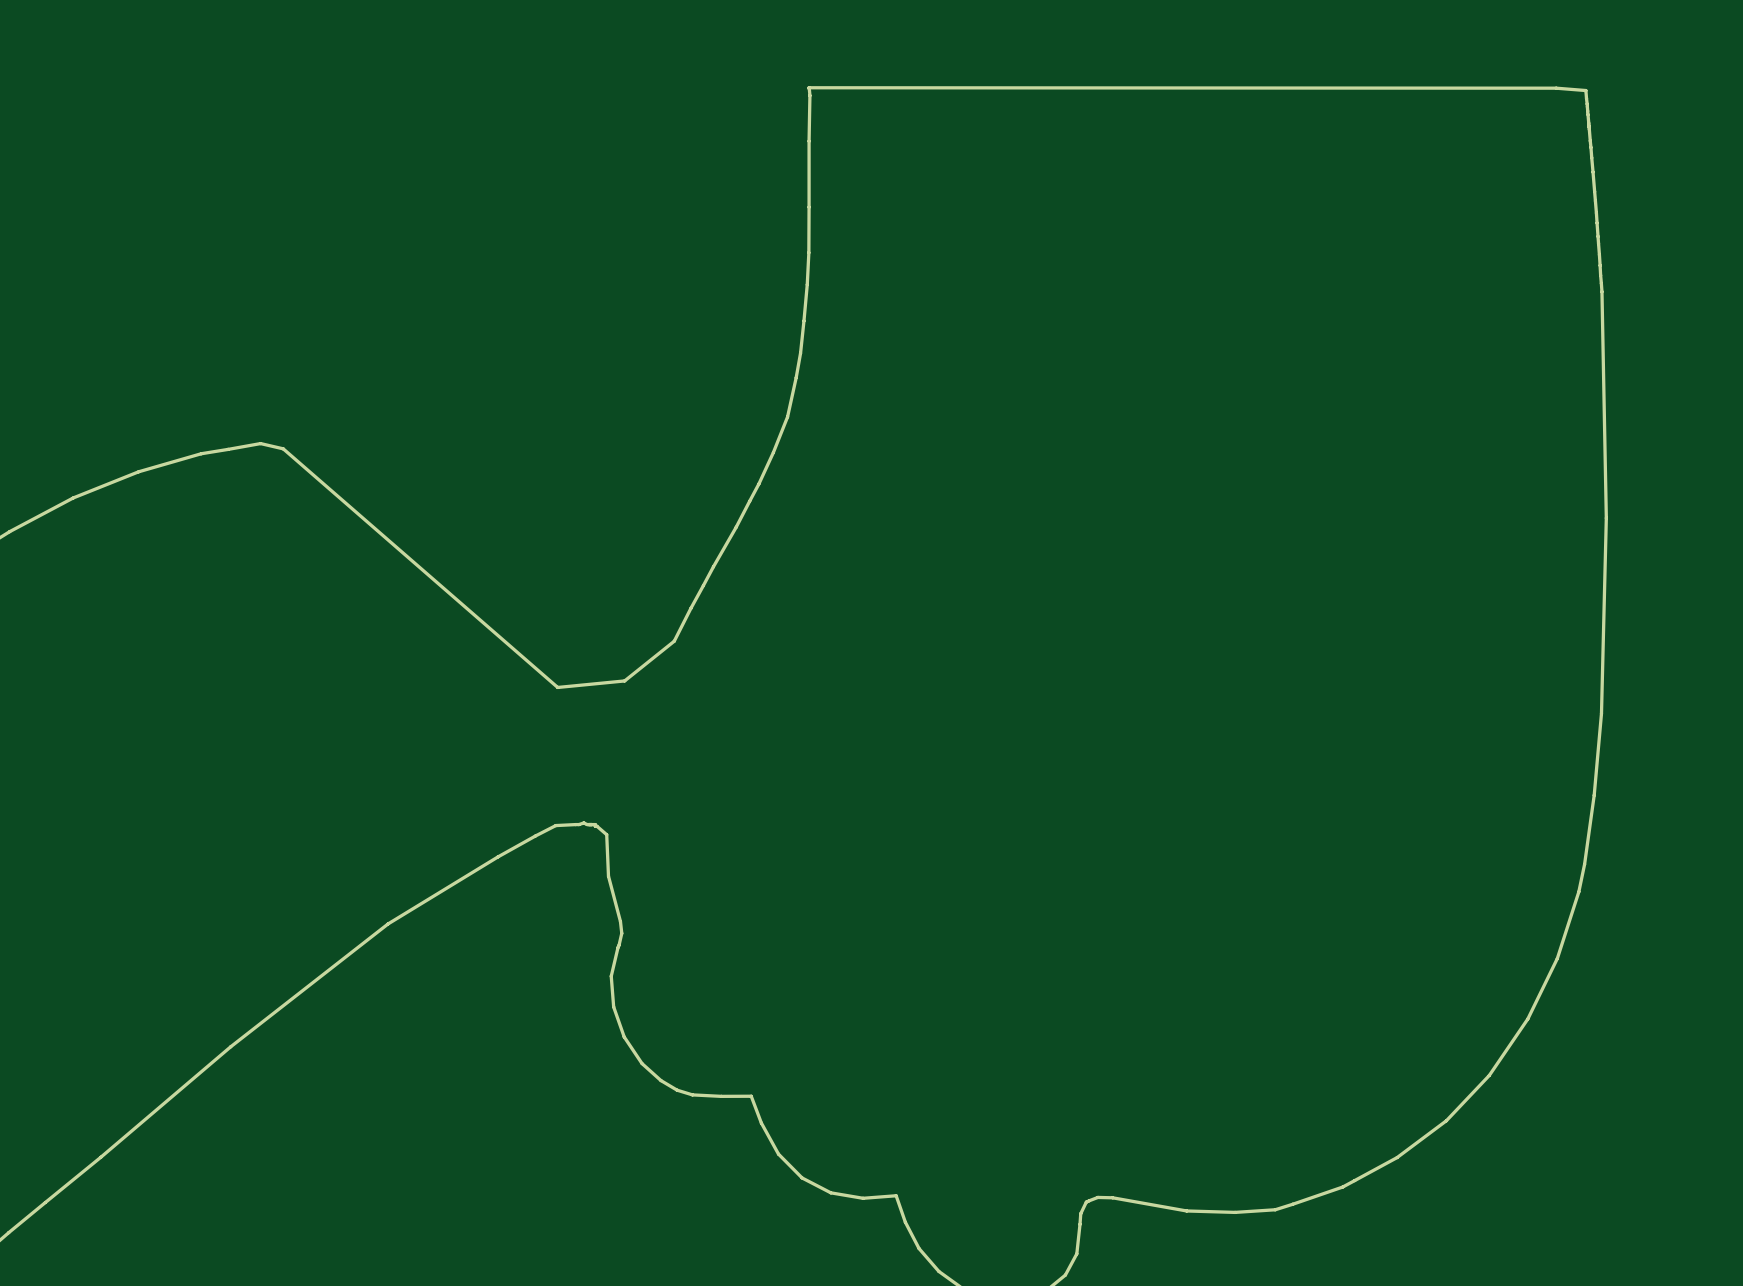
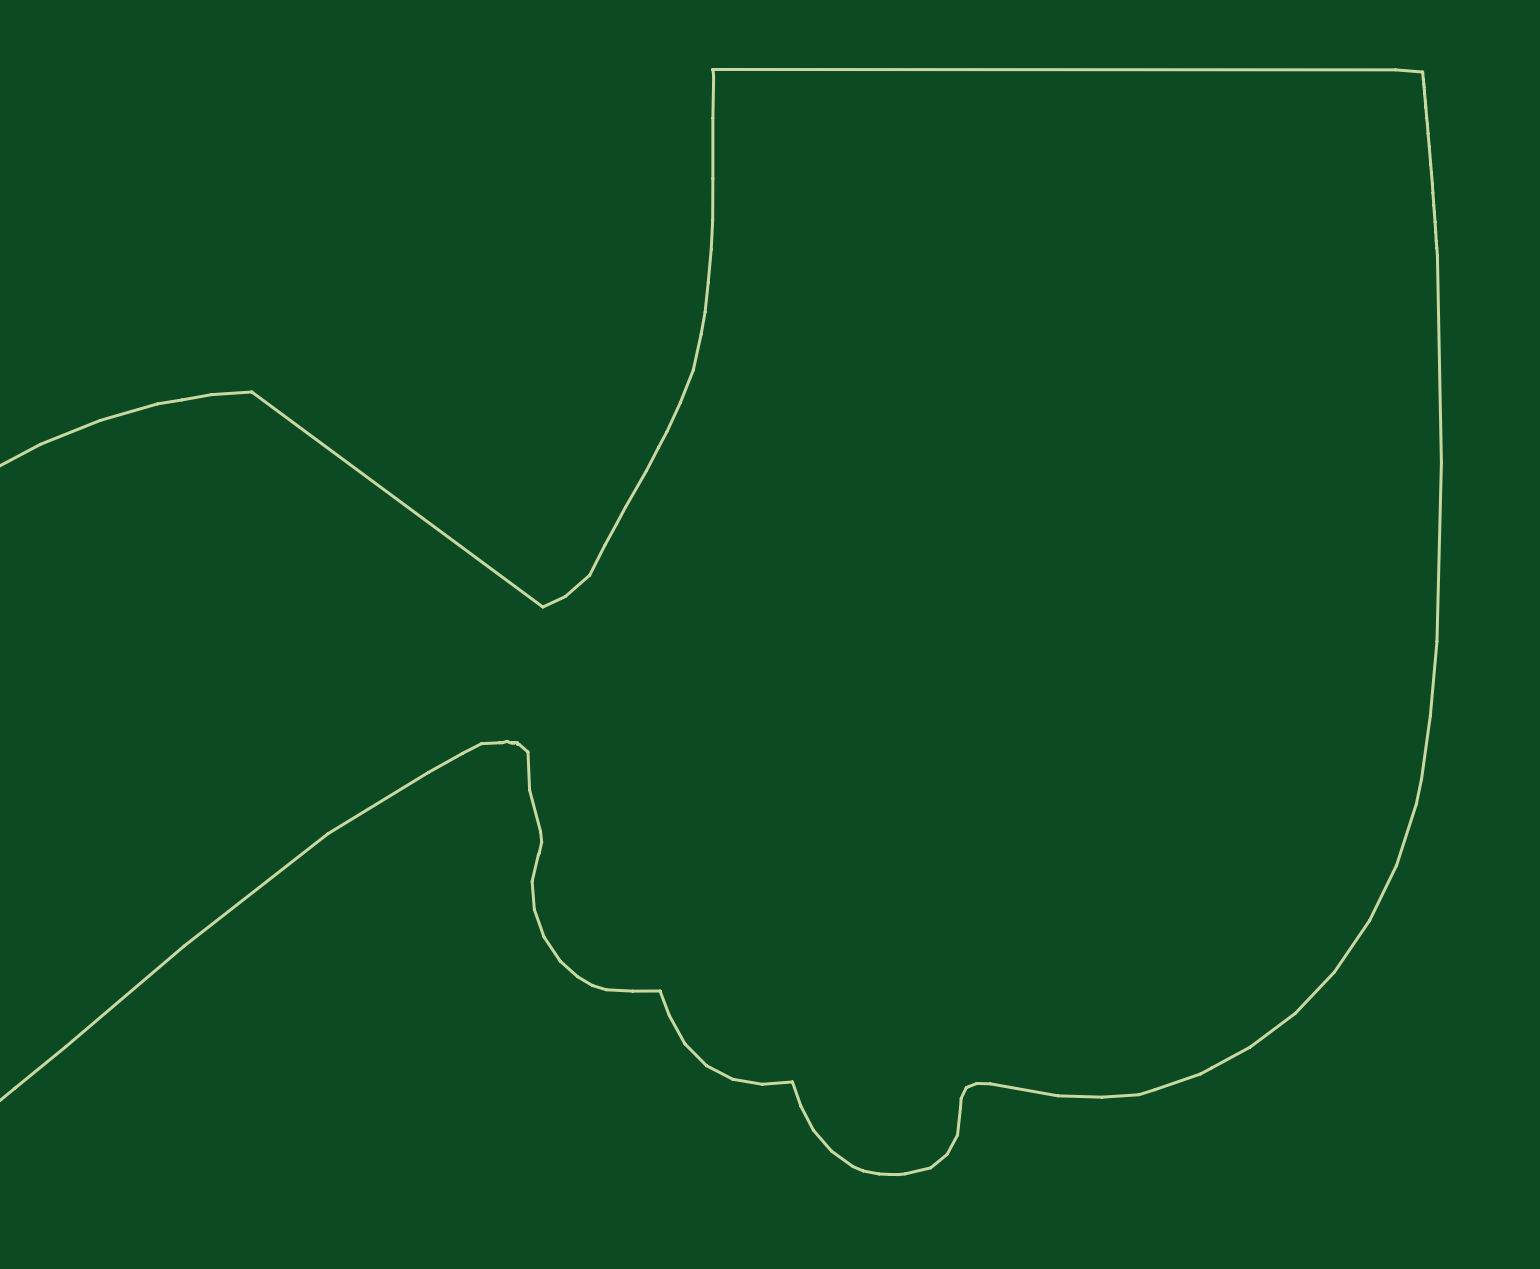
board edge: (260, 443) (283, 448) (557, 687) (624, 680) (674, 641) -> (211, 394) (251, 391) (542, 607) (565, 596) (589, 575)

